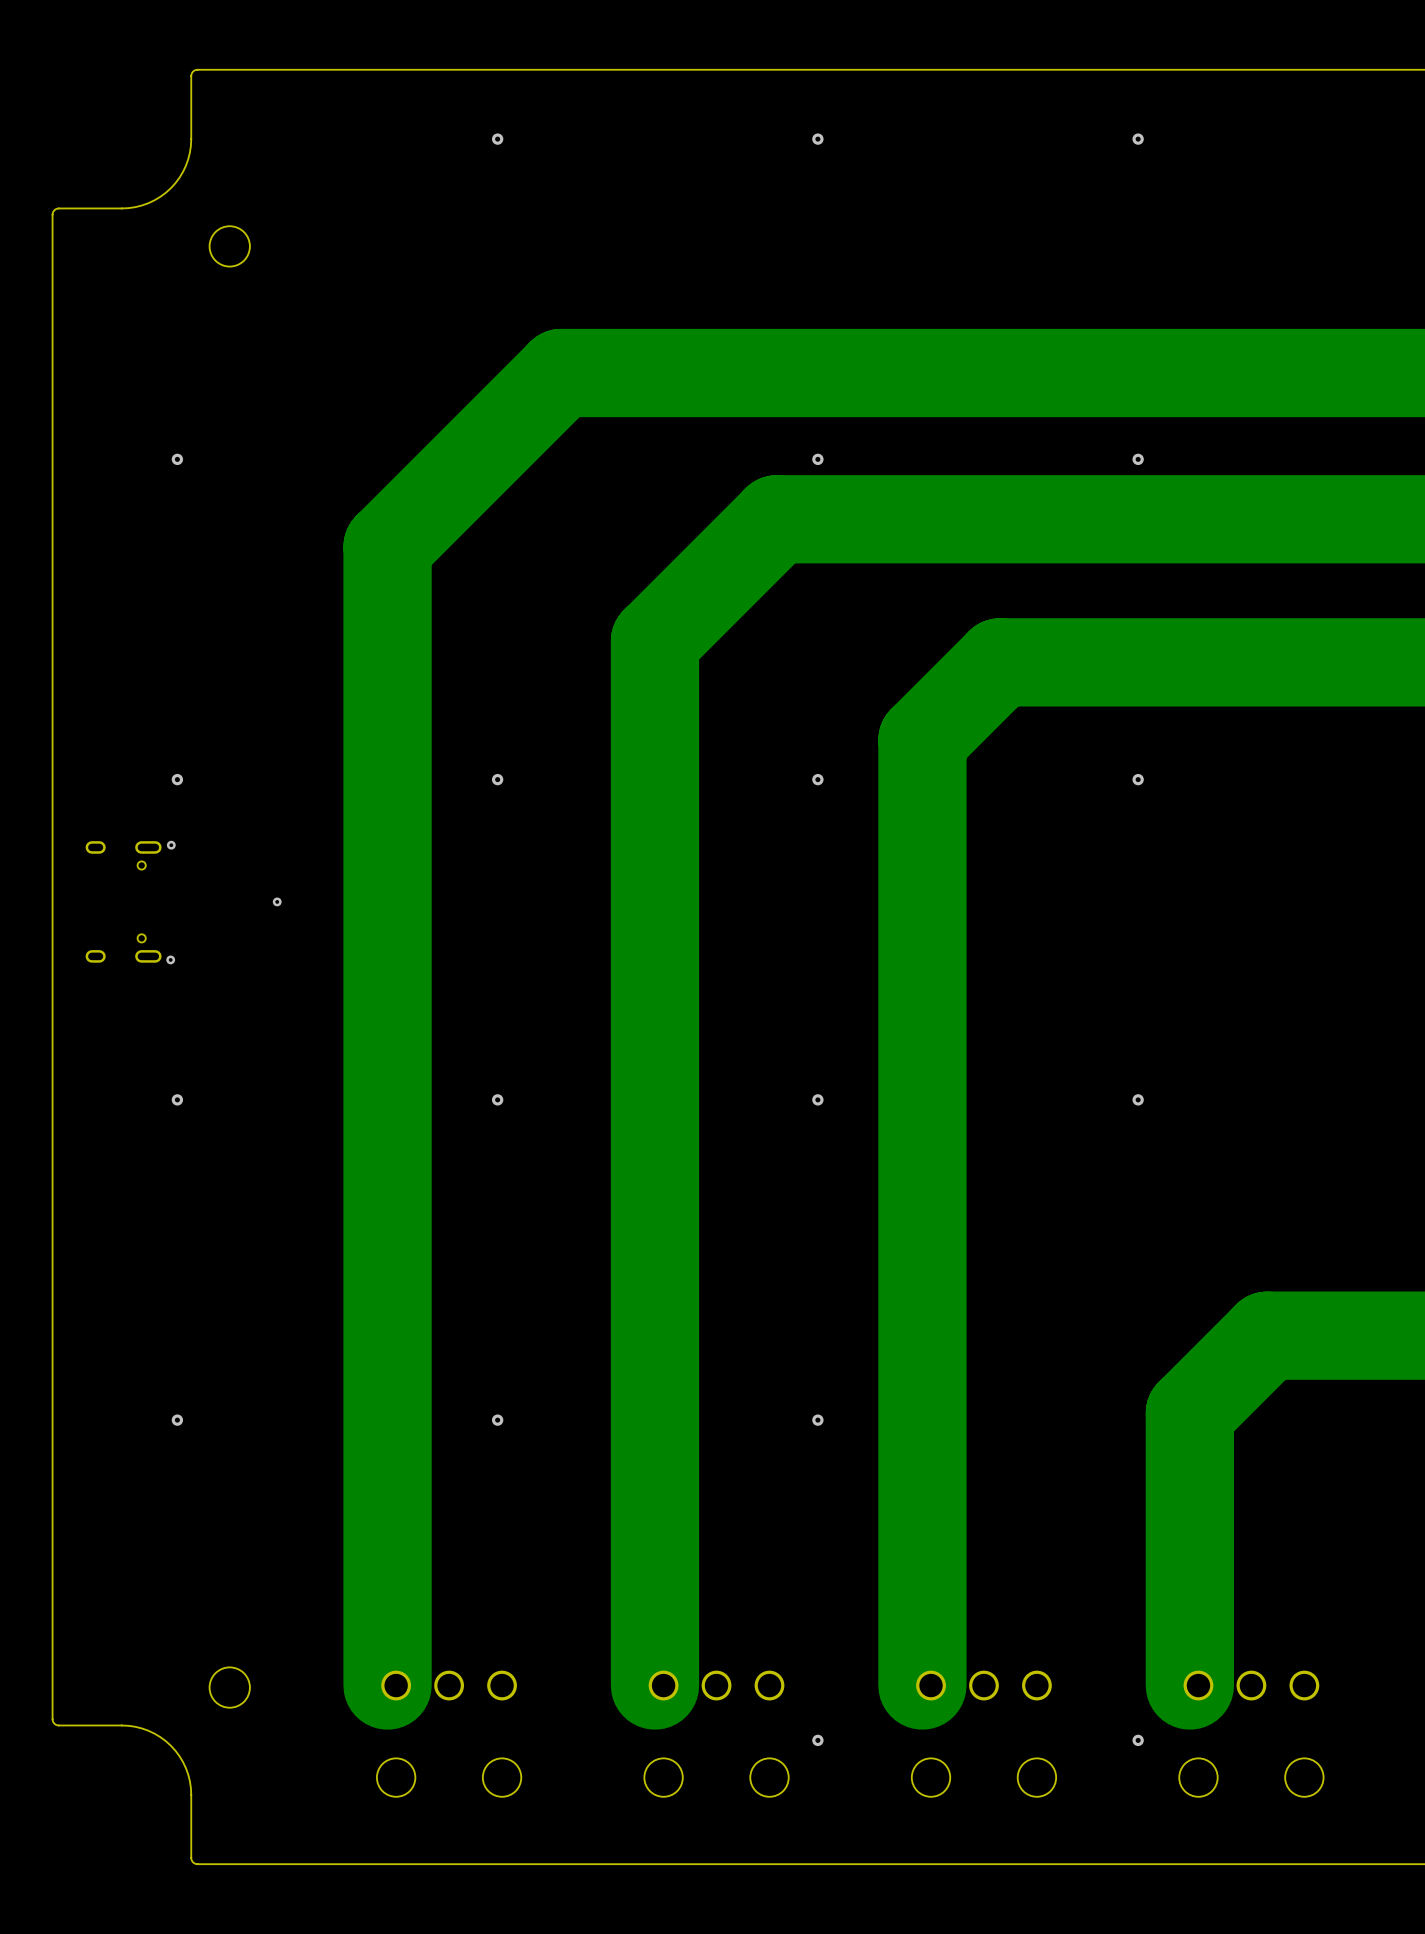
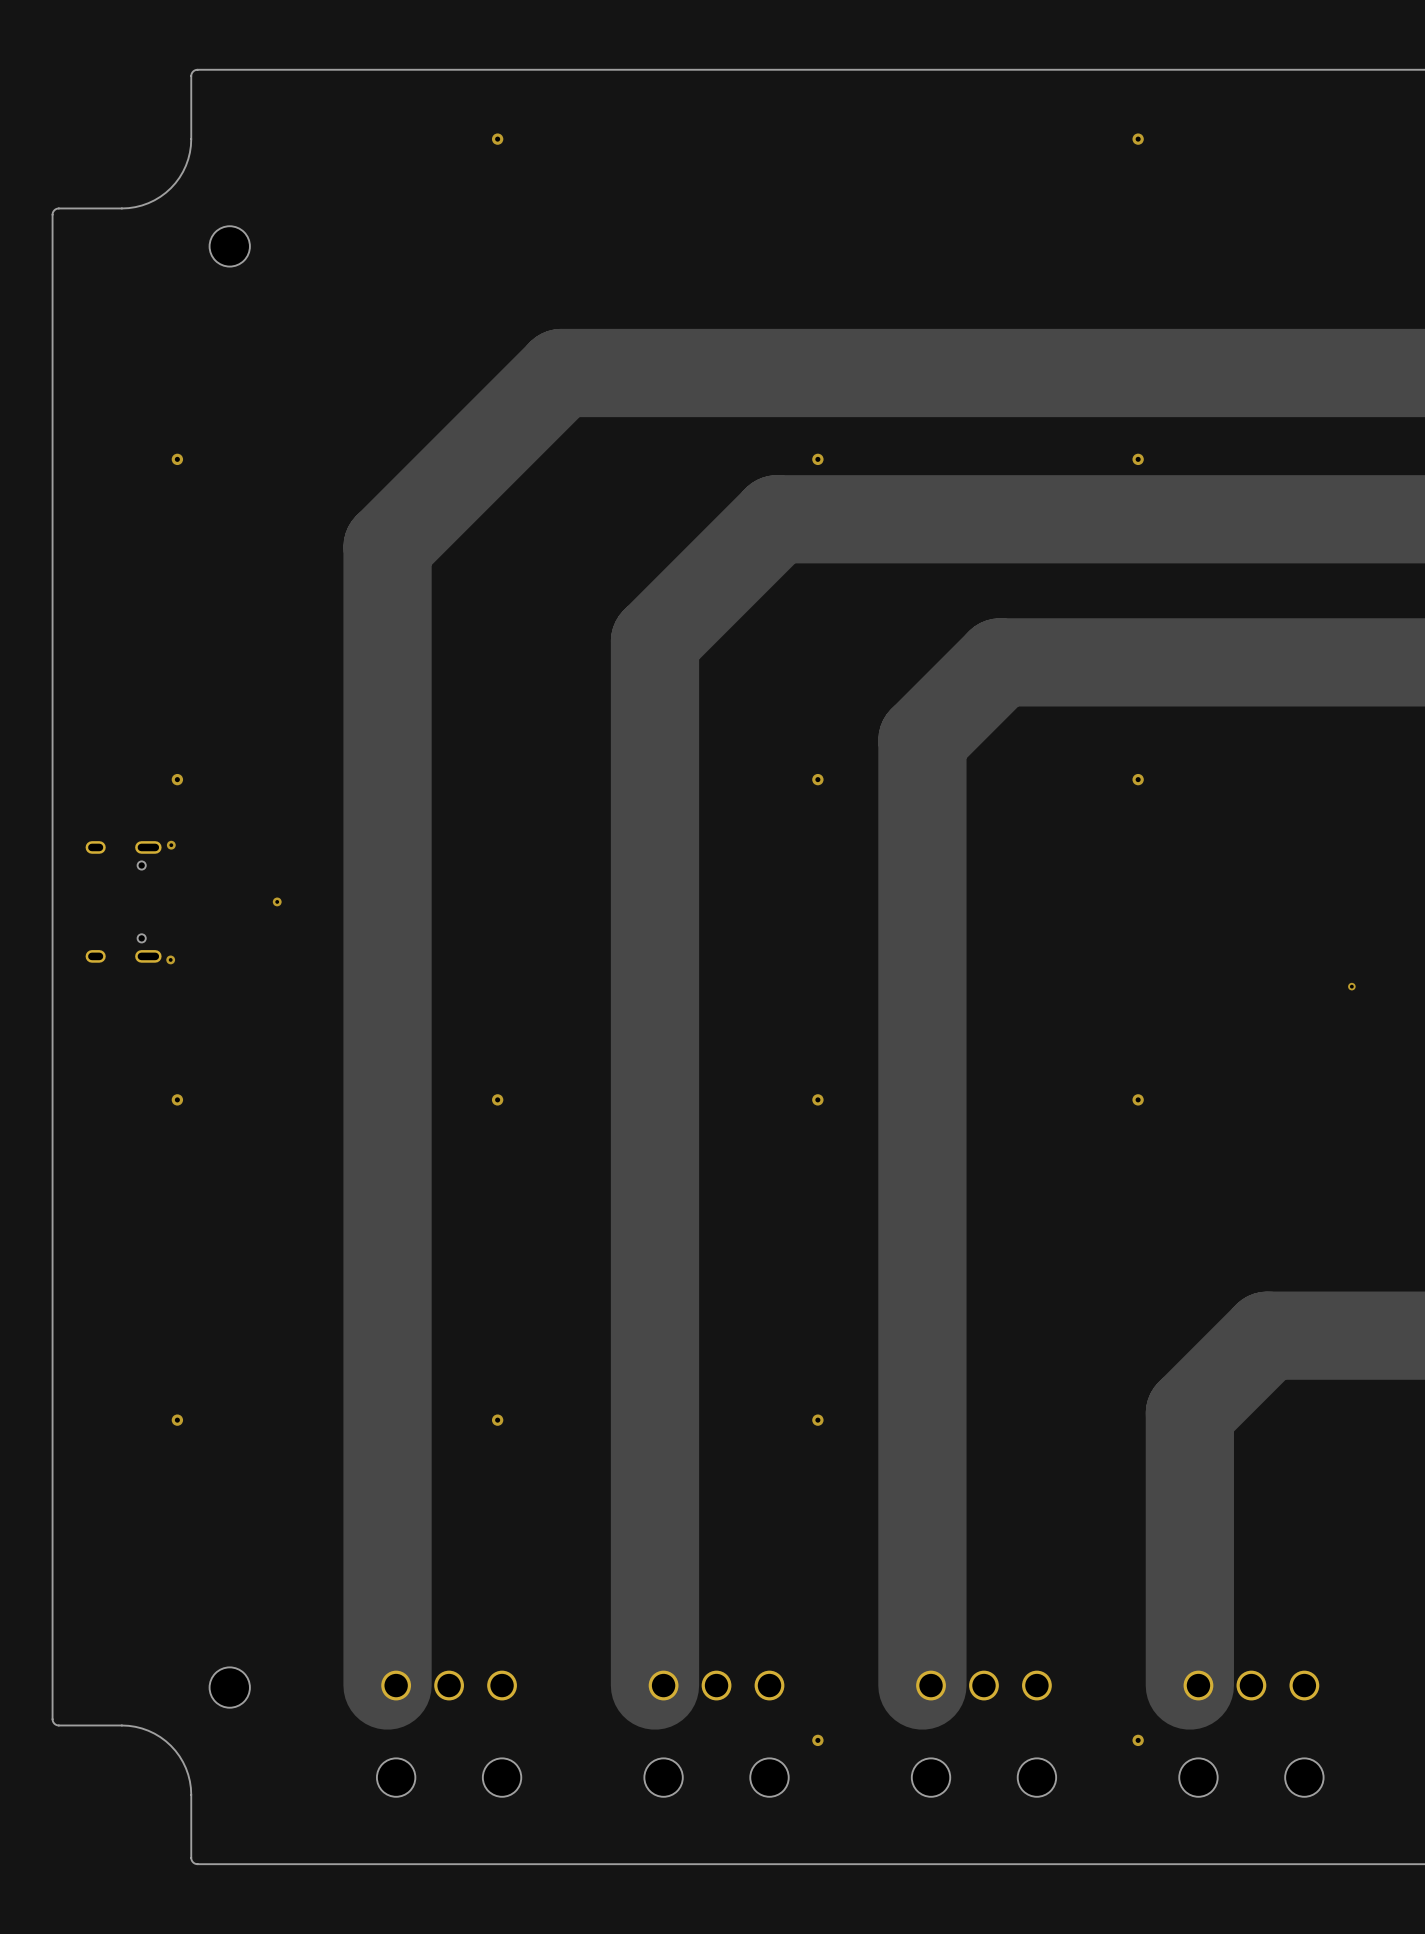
via: (817, 139) -> none
via: (497, 779) -> none
via: none -> (1351, 986)

